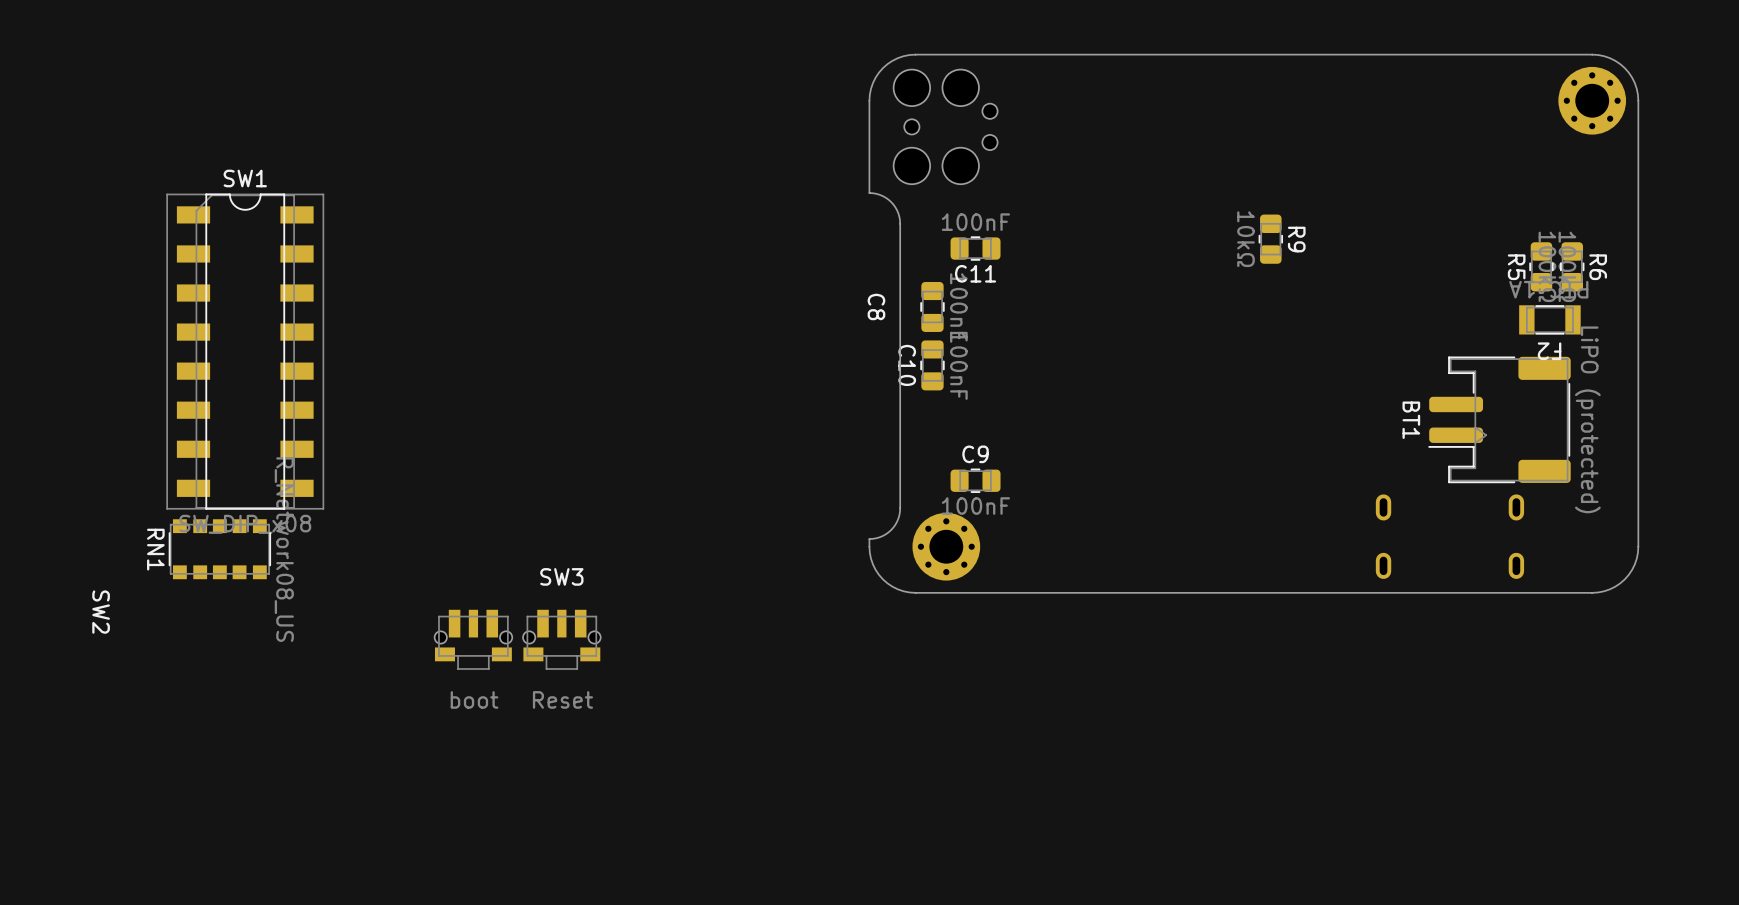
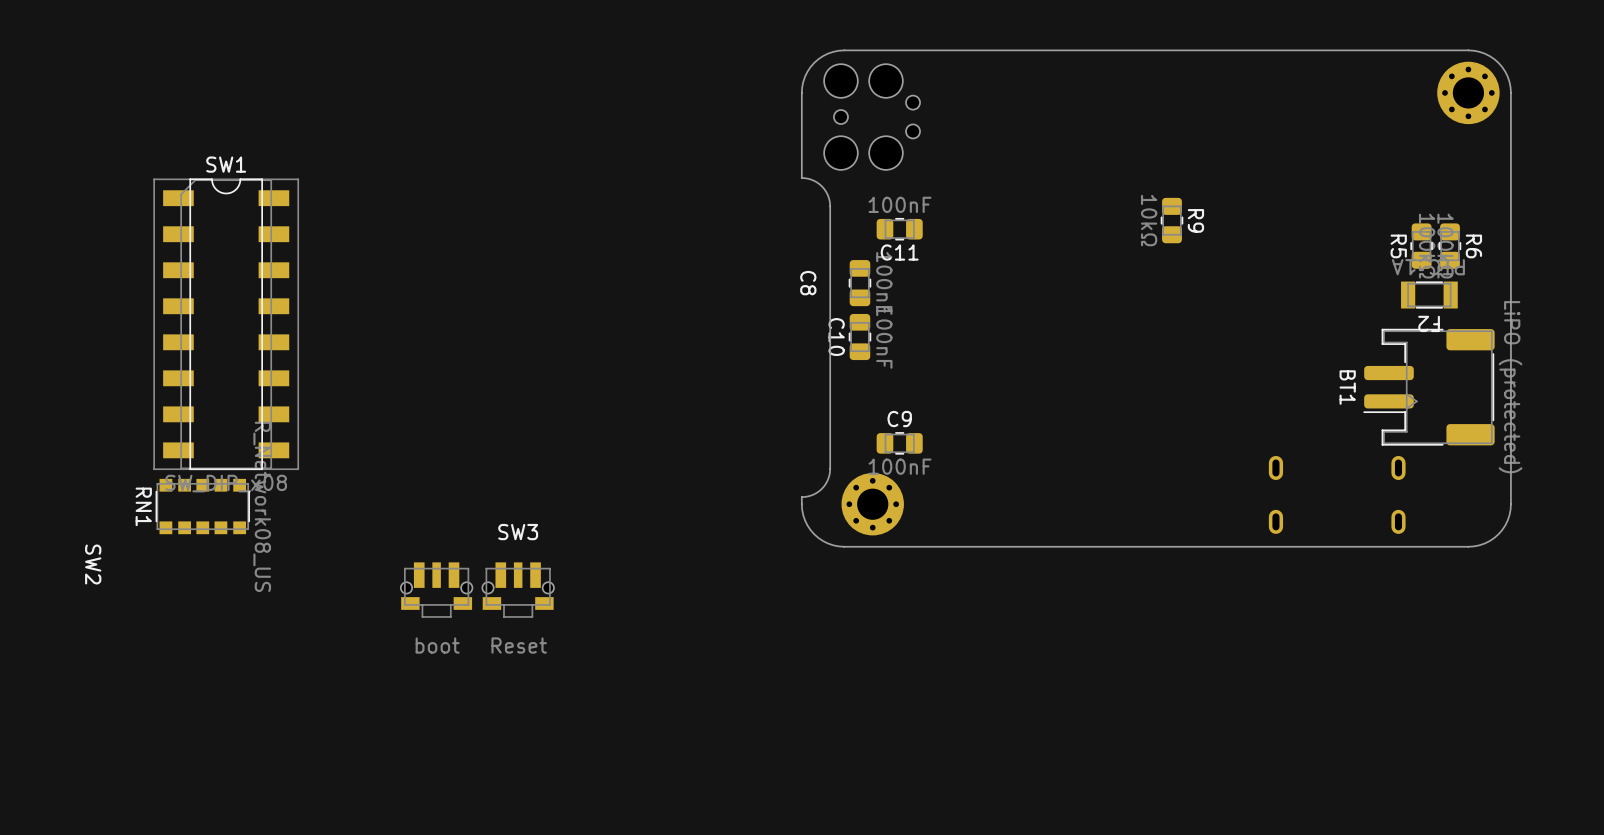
BT1 position: (1499, 419) -> (1428, 387)

